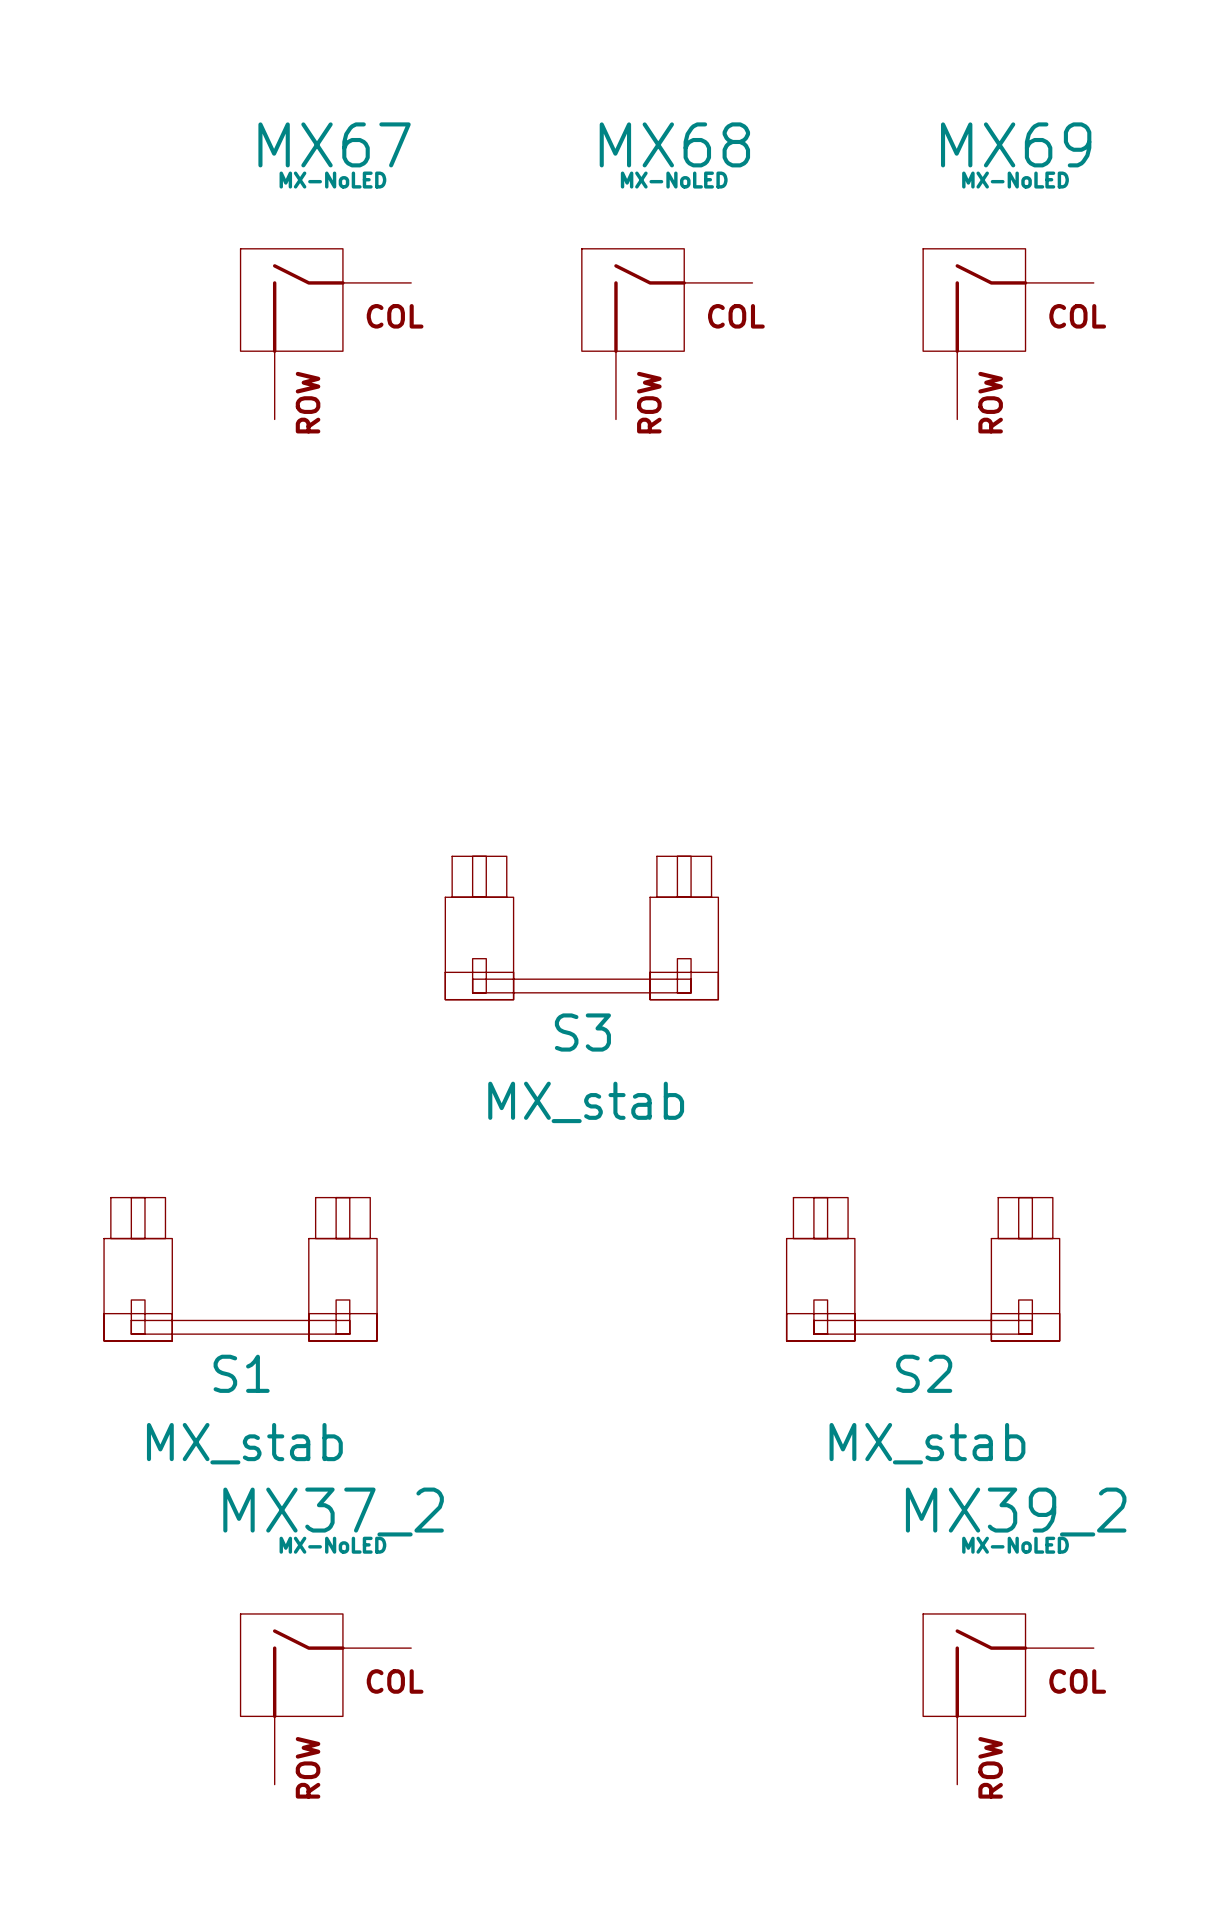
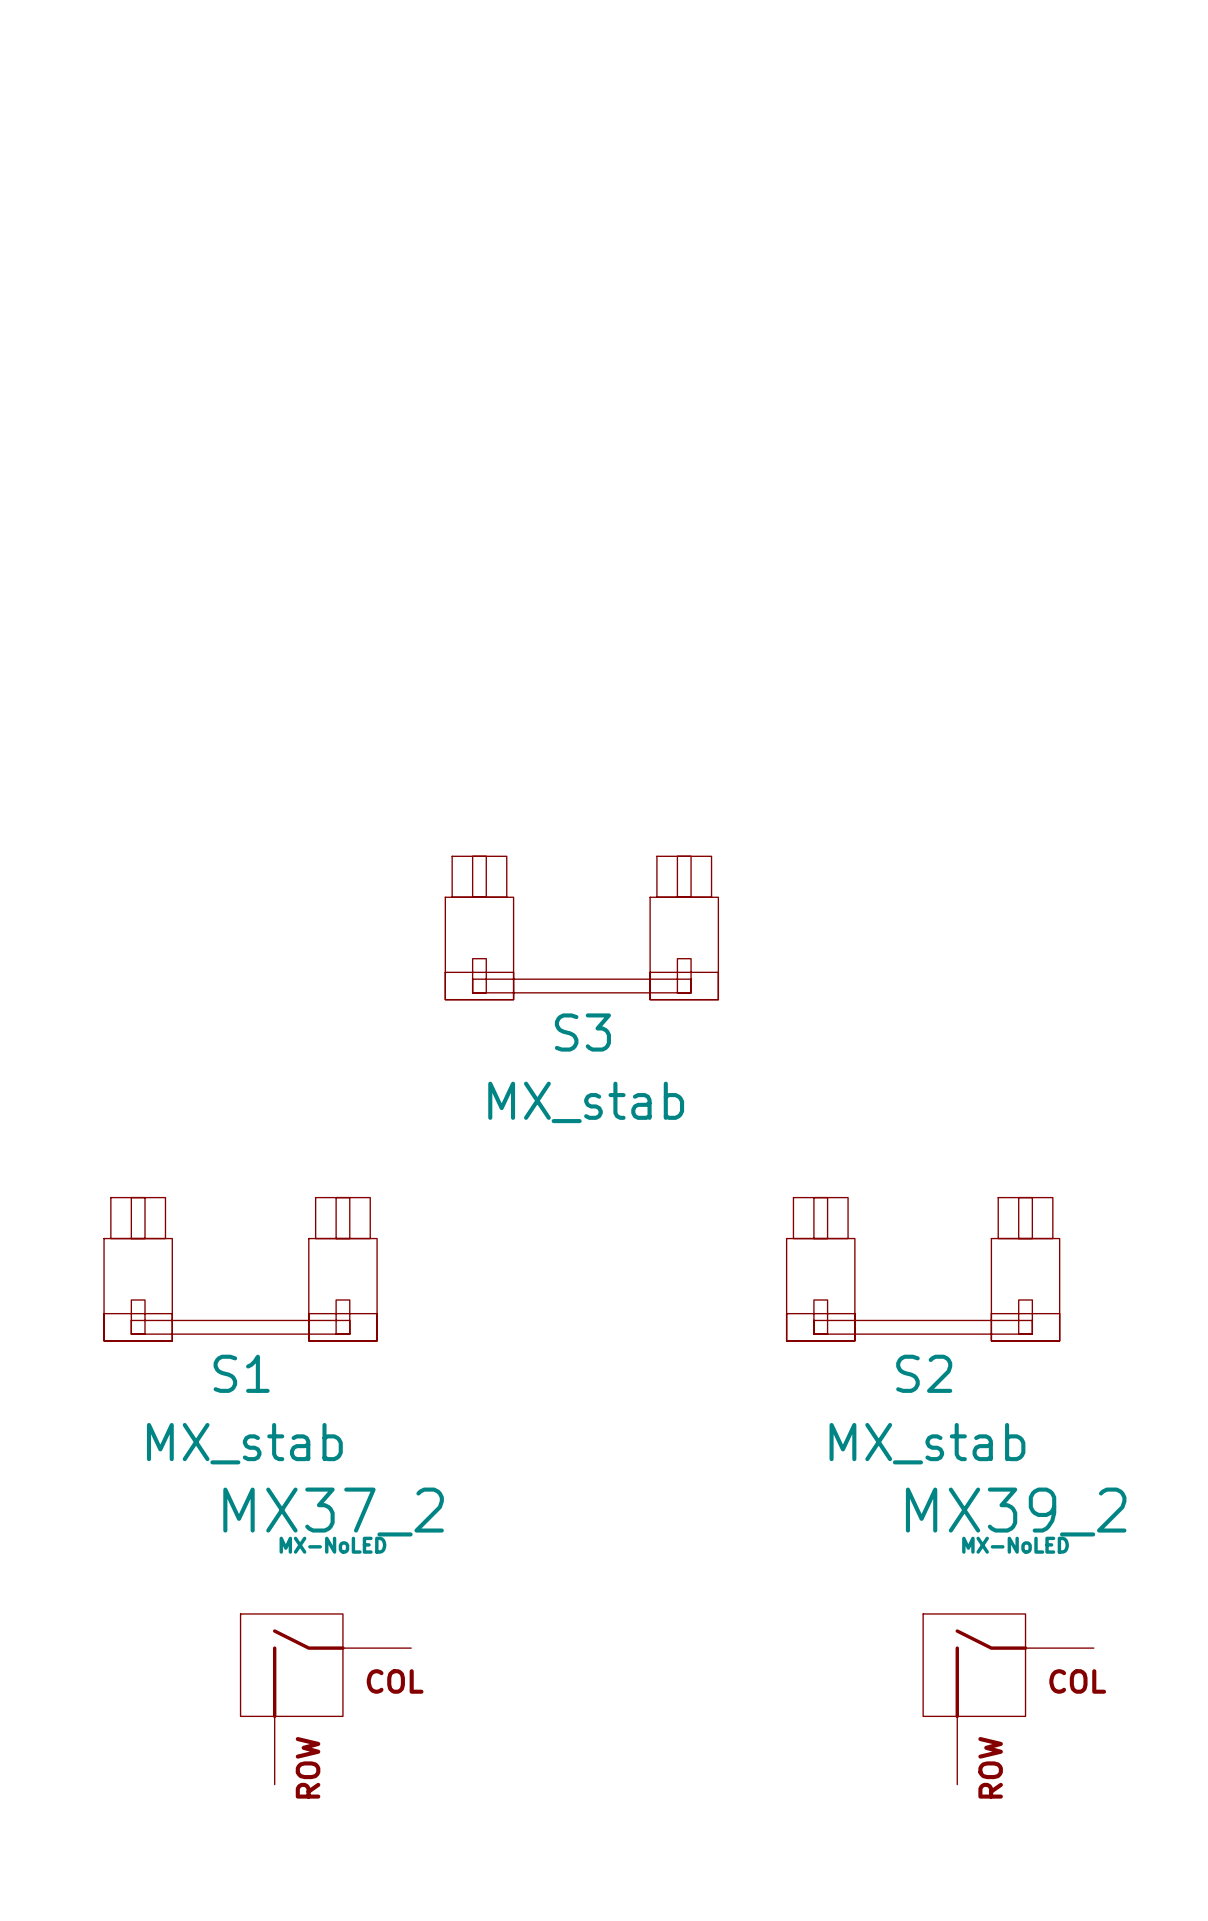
MX67: MX-NoLED (325, 334) -> none
MX68: MX-NoLED (667, 334) -> none
MX69: MX-NoLED (1008, 334) -> none

